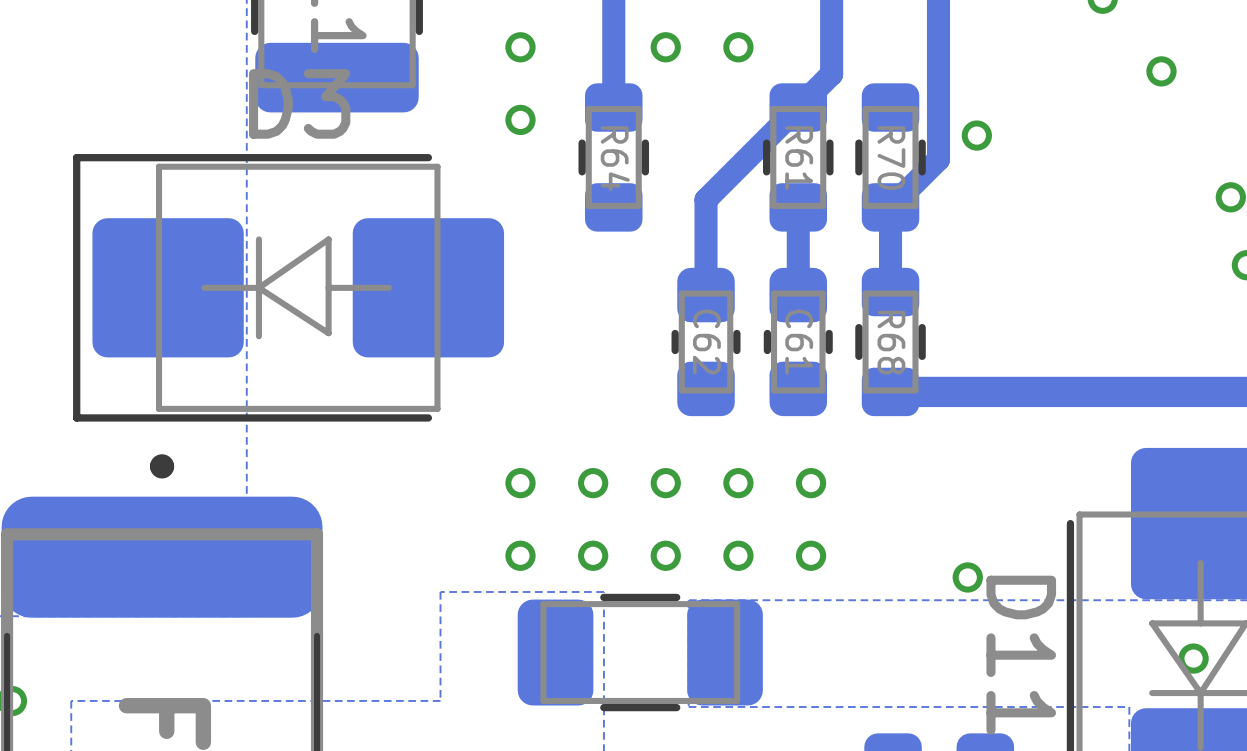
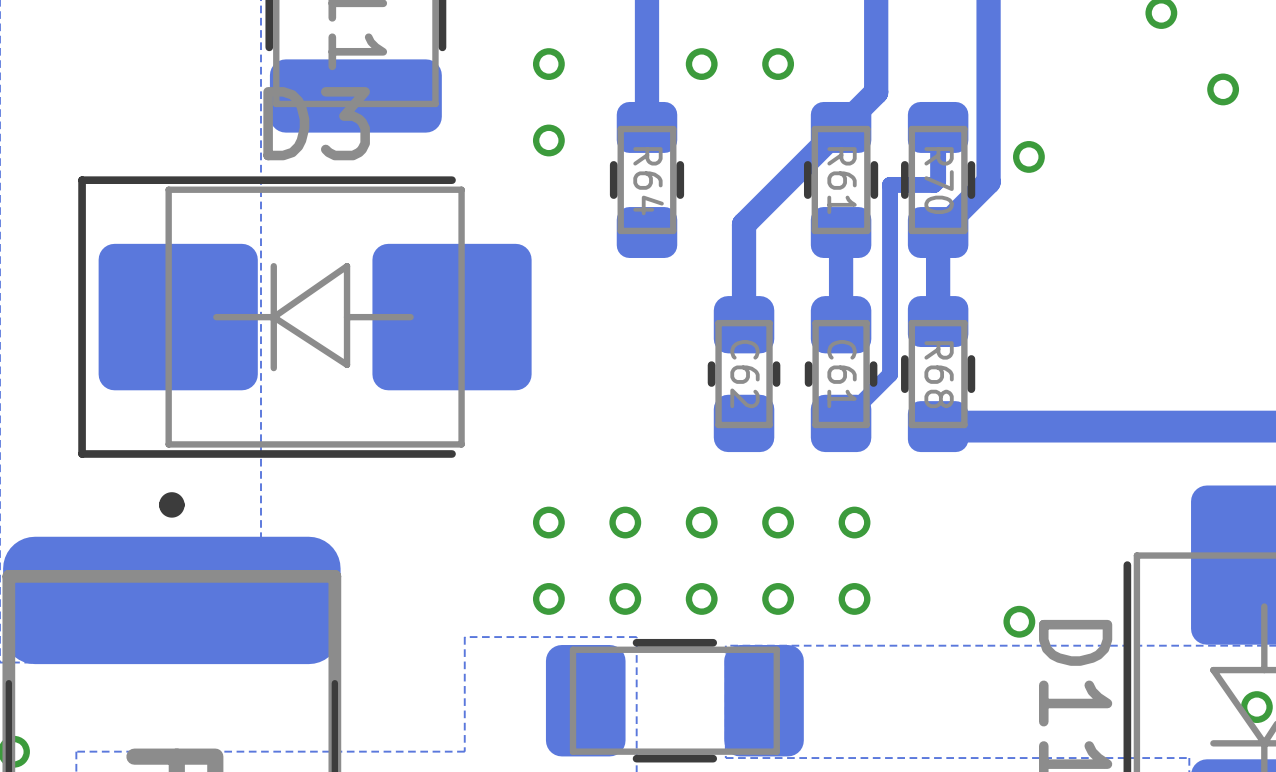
track: none -> (938, 127) (938, 181) (934, 184) (890, 184) (890, 374) (841, 423)

